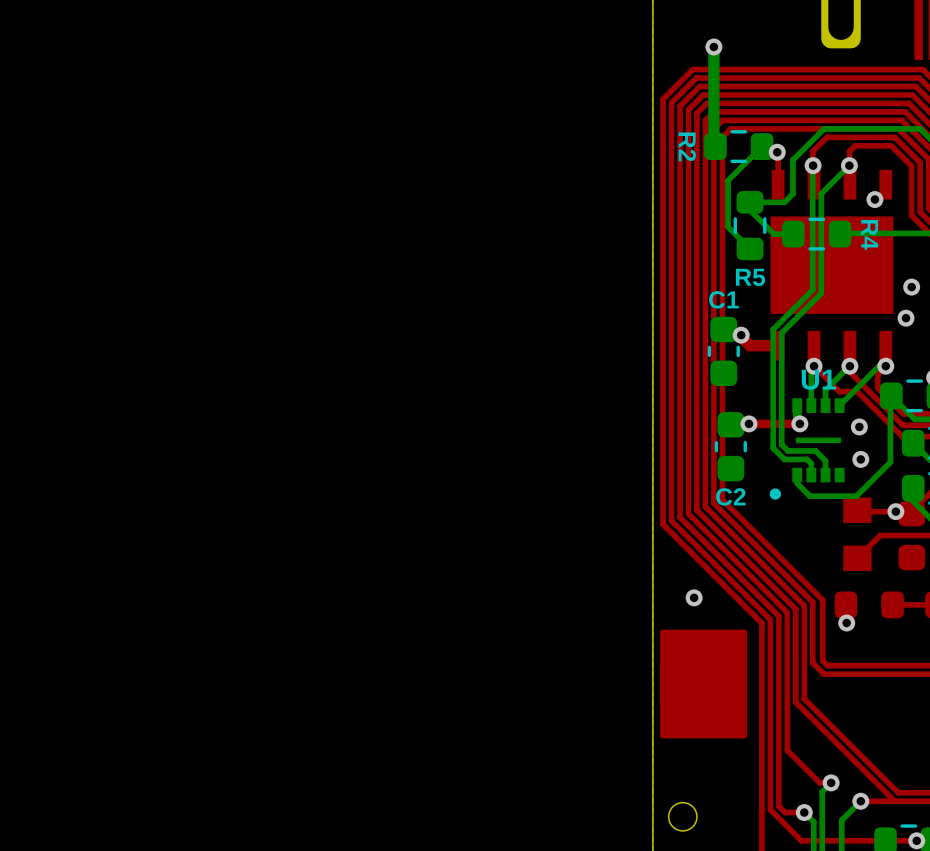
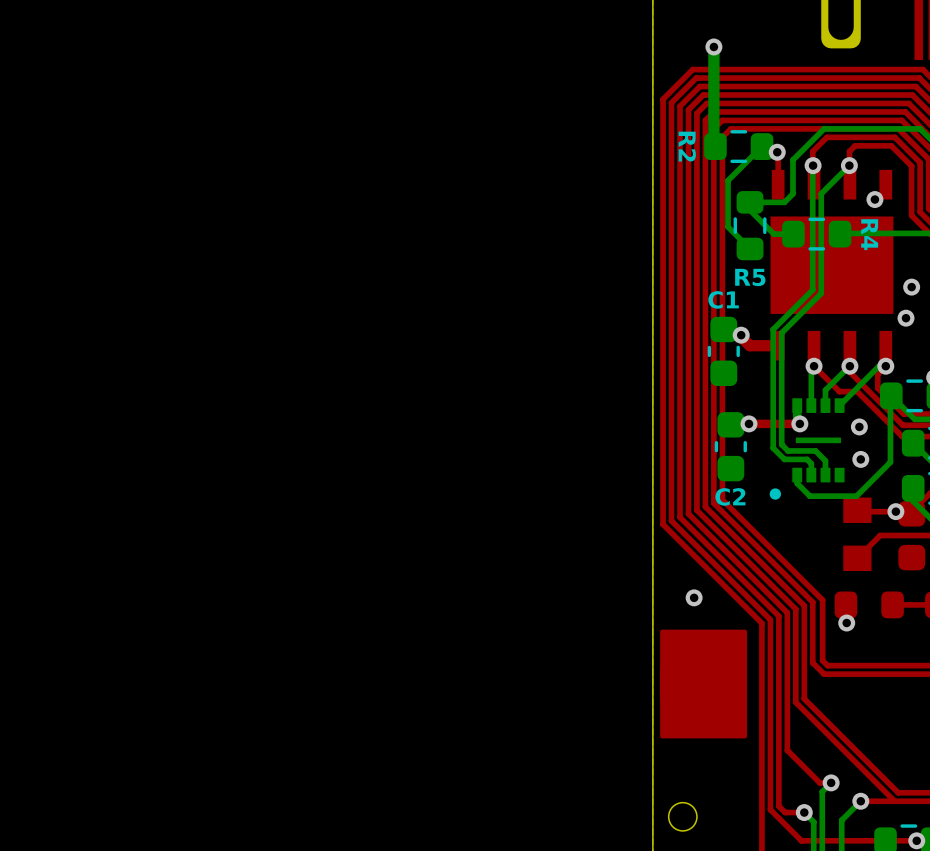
U1 name: U1 (818, 379) -> none

